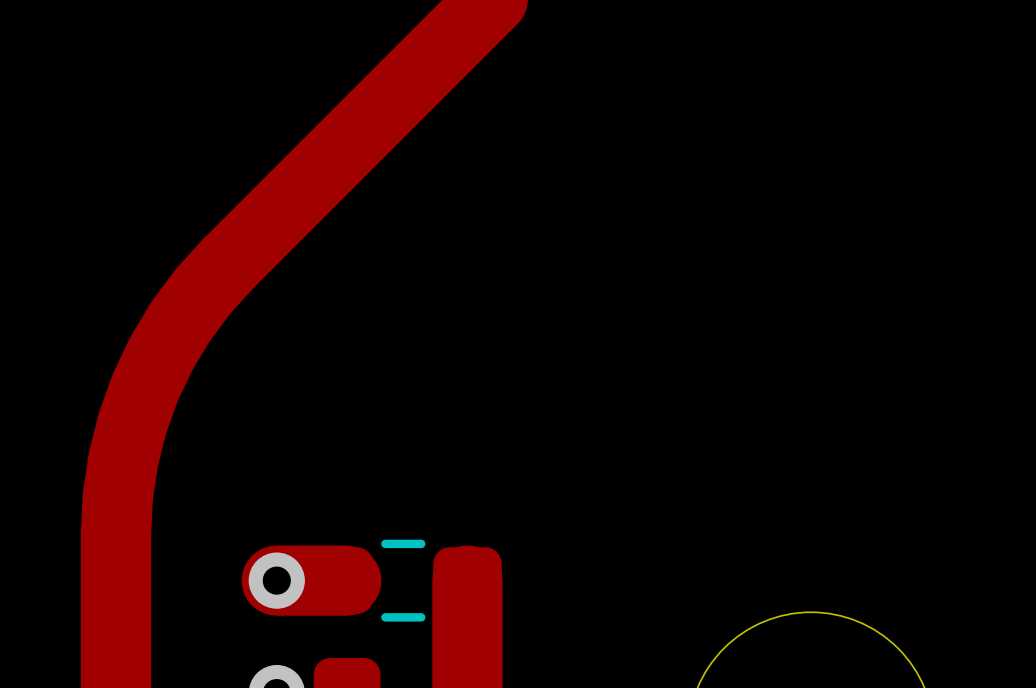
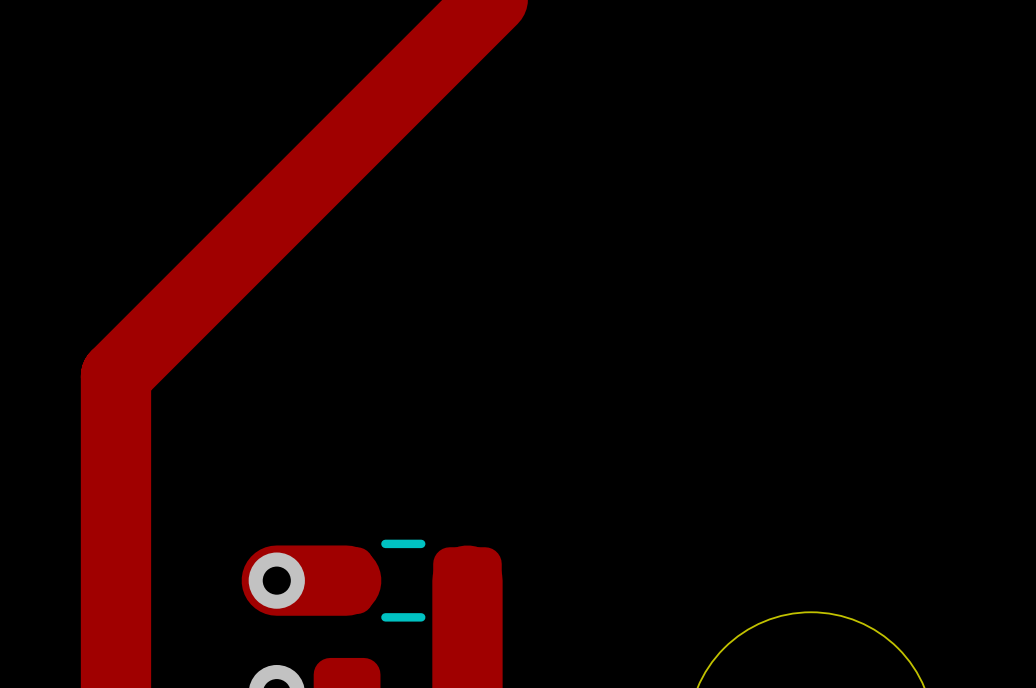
track: (228, 263) (202, 291) (180, 321) (161, 354) (145, 387) (132, 423) (123, 459) (117, 496) (115, 534) -> (228, 263) (115, 375) (115, 534)

